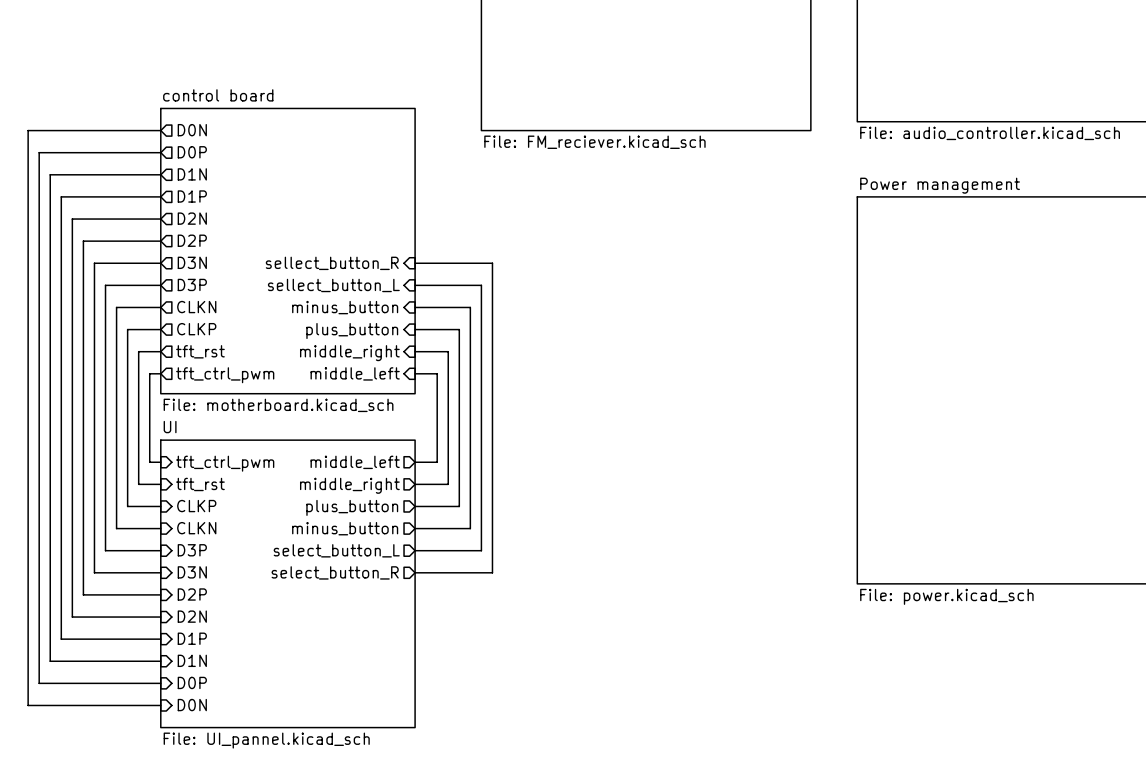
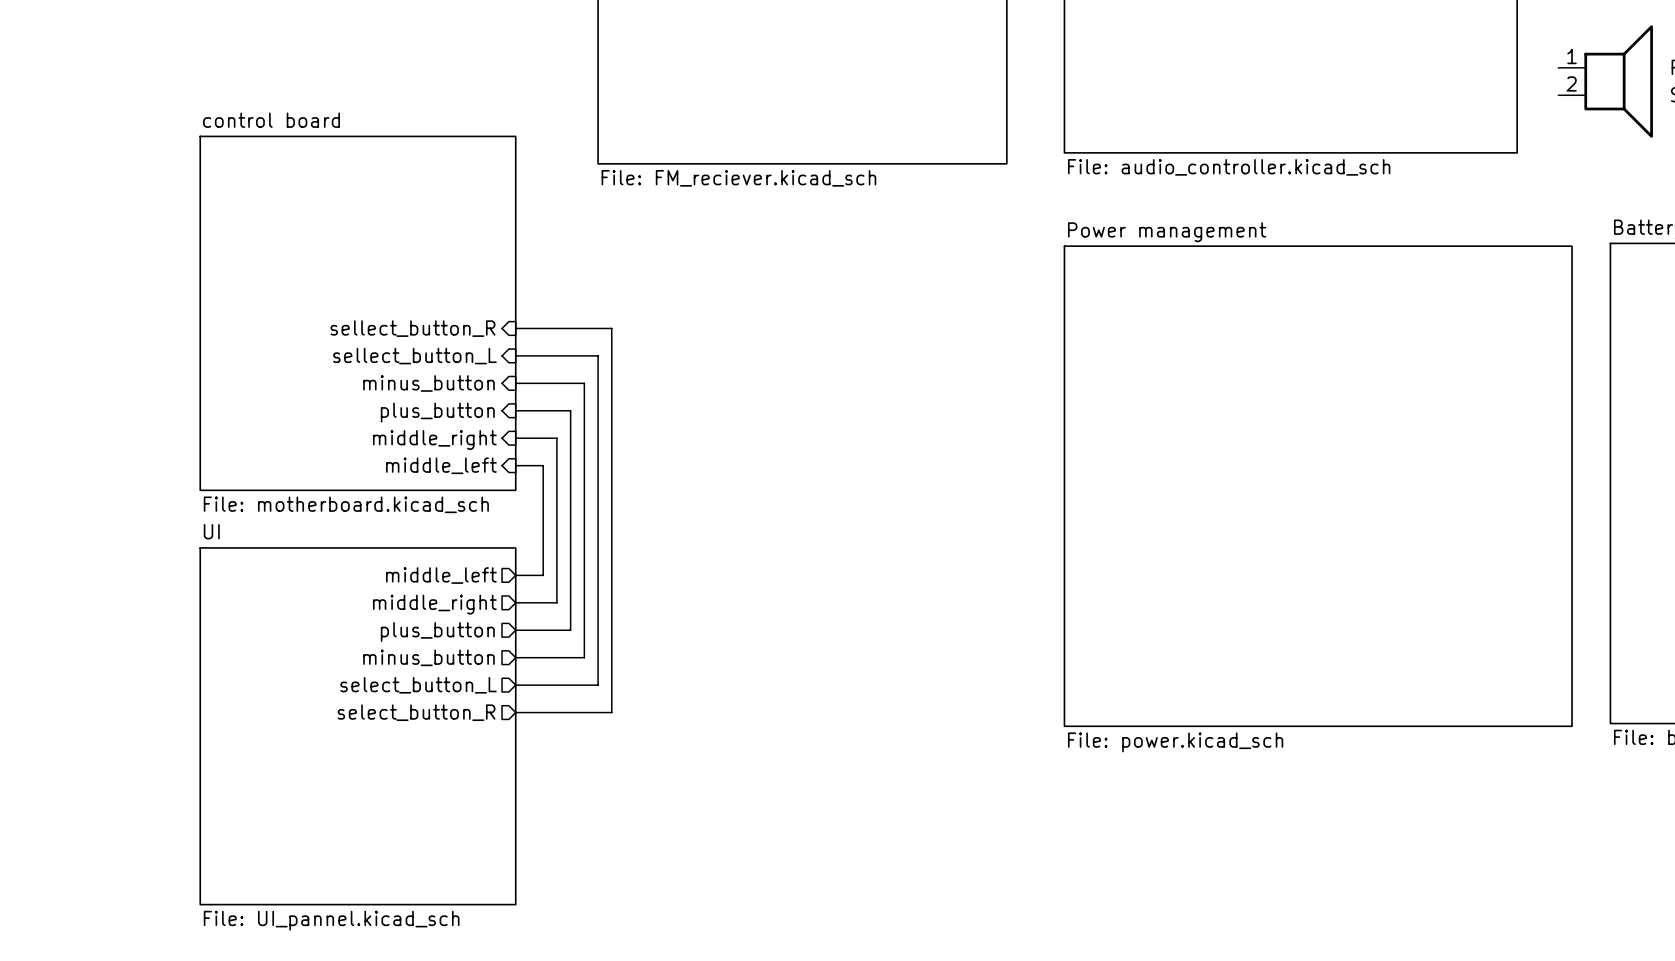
wire: (160, 130) (28, 130) (28, 705) (160, 705) -> none
sheet pin: D0N (192, 130) -> none
wire: (160, 152) (39, 152) (39, 683) (160, 683) -> none
sheet pin: D0P (192, 152) -> none
wire: (160, 174) (50, 174) (50, 661) (160, 661) -> none
sheet pin: D1N (192, 174) -> none
wire: (160, 196) (61, 196) (61, 639) (160, 639) -> none
sheet pin: D1P (192, 196) -> none
sheet pin: D2N (192, 218) -> none
wire: (160, 219) (72, 219) (72, 617) (160, 617) -> none
sheet pin: D2P (192, 240) -> none
wire: (160, 241) (83, 241) (83, 594) (160, 594) -> none
sheet pin: D3N (192, 262) -> none
wire: (160, 263) (94, 263) (94, 572) (160, 572) -> none
sheet pin: D3P (192, 284) -> none
wire: (160, 285) (105, 285) (105, 550) (160, 550) -> none
wire: (160, 307) (116, 307) (116, 528) (160, 528) -> none
sheet pin: CLKN (196, 307) -> none
wire: (160, 329) (127, 329) (127, 506) (160, 506) -> none
sheet pin: CLKP (196, 329) -> none
wire: (160, 351) (138, 351) (138, 484) (160, 484) -> none
sheet pin: tft_rst (200, 351) -> none
wire: (160, 373) (149, 373) (149, 462) (160, 462) -> none
sheet pin: tft_ctrl_pwm (225, 375) -> none
sheet pin: tft_ctrl_pwm (225, 463) -> none
sheet pin: tft_rst (200, 484) -> none
sheet pin: CLKP (196, 506) -> none
sheet pin: CLKN (196, 528) -> none
sheet pin: D3P (192, 550) -> none
sheet pin: D3N (192, 572) -> none
sheet pin: D2P (192, 594) -> none
sheet pin: D2N (192, 616) -> none
sheet pin: D1P (192, 638) -> none
sheet pin: D1N (192, 660) -> none
sheet pin: D0P (192, 682) -> none
sheet pin: D0N (192, 705) -> none

